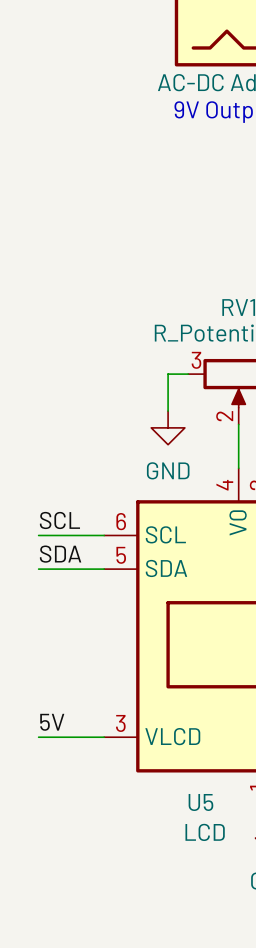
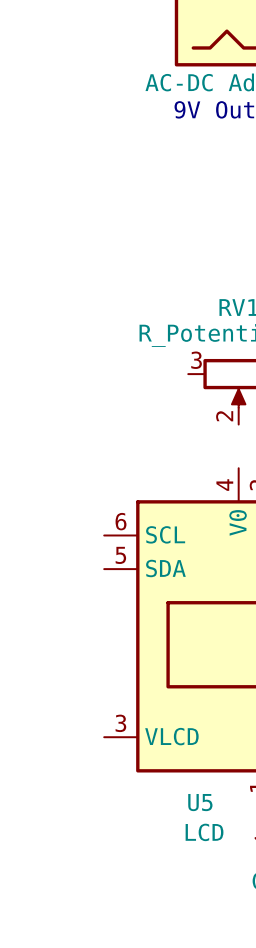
wire: (188, 374) (168, 374) (168, 411) -> none
wire: (238, 424) (238, 468) -> none
power symbol: GND (168, 427) -> none
label: SCL (59, 520) -> none
wire: (38, 535) (104, 535) -> none
label: SDA (60, 554) -> none
wire: (38, 569) (104, 569) -> none
label: 5V (52, 722) -> none
wire: (38, 737) (104, 737) -> none

